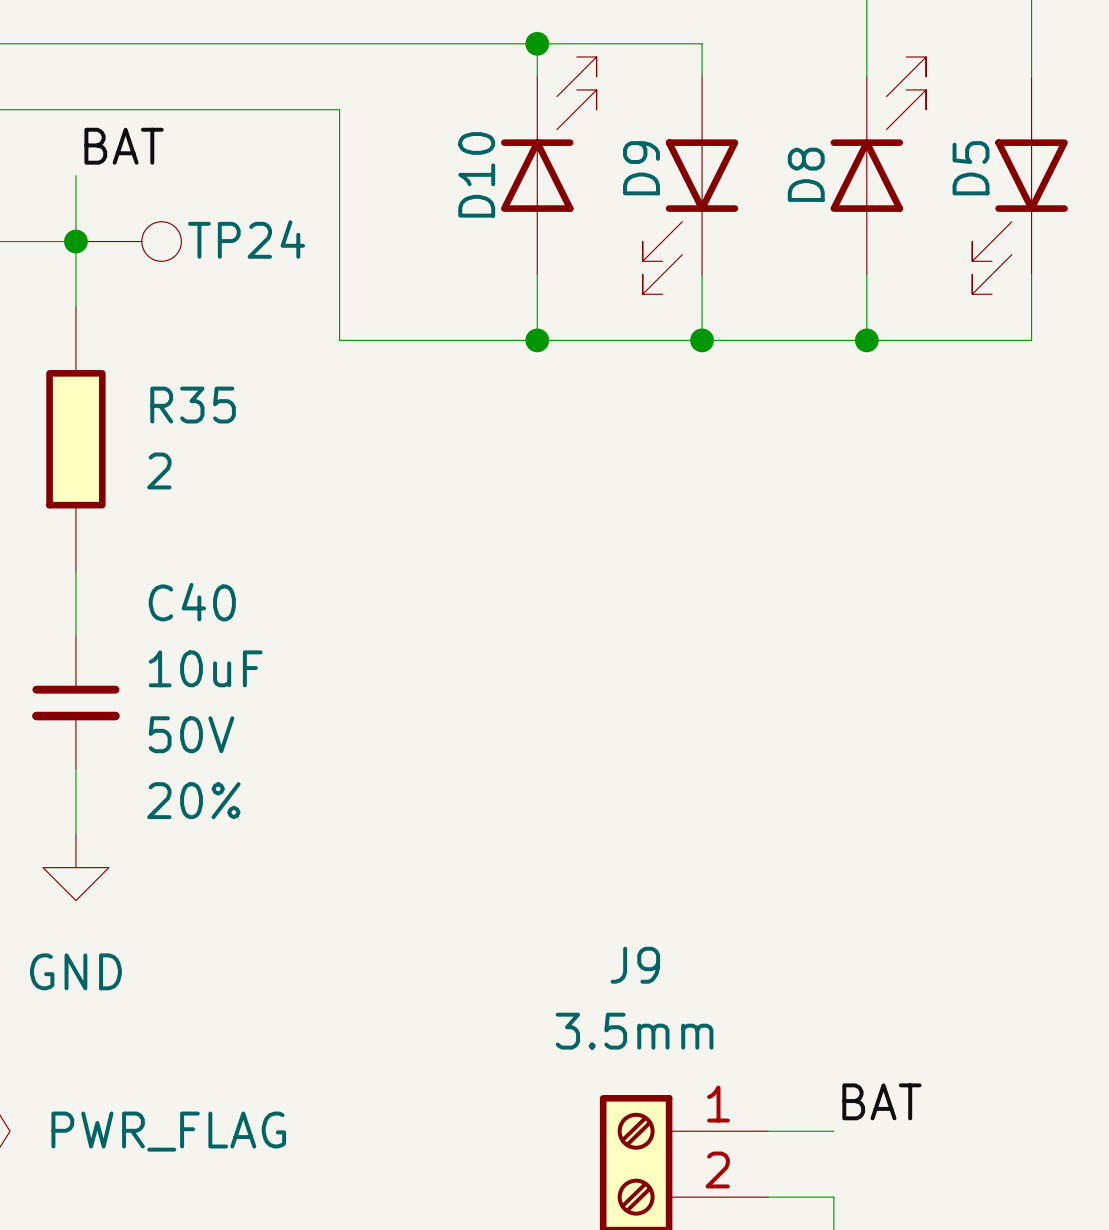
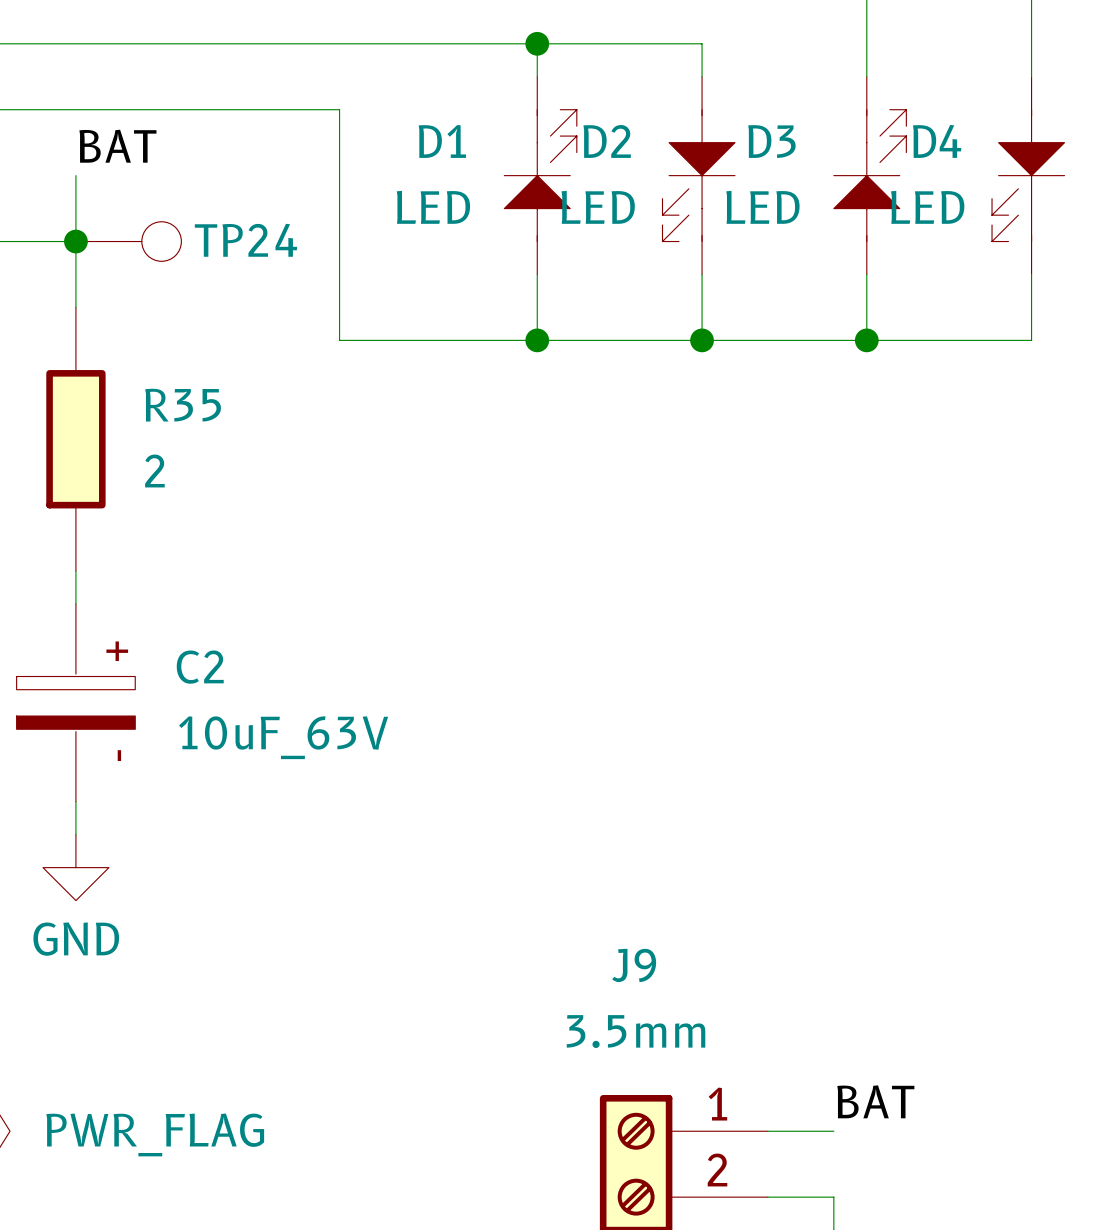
D10: (548, 165) -> none
D8: (878, 165) -> none
D1: none -> LED (540, 175)
D2: none -> LED (698, 175)
D3: none -> LED (870, 175)
D4: none -> LED (1028, 175)
D9: (690, 185) -> none
D5: (1020, 185) -> none
C40: 10uF (75, 702) -> none
C2: none -> 10uF_63V (75, 702)
power symbol text position: GND (75, 971) -> GND (76, 939)

